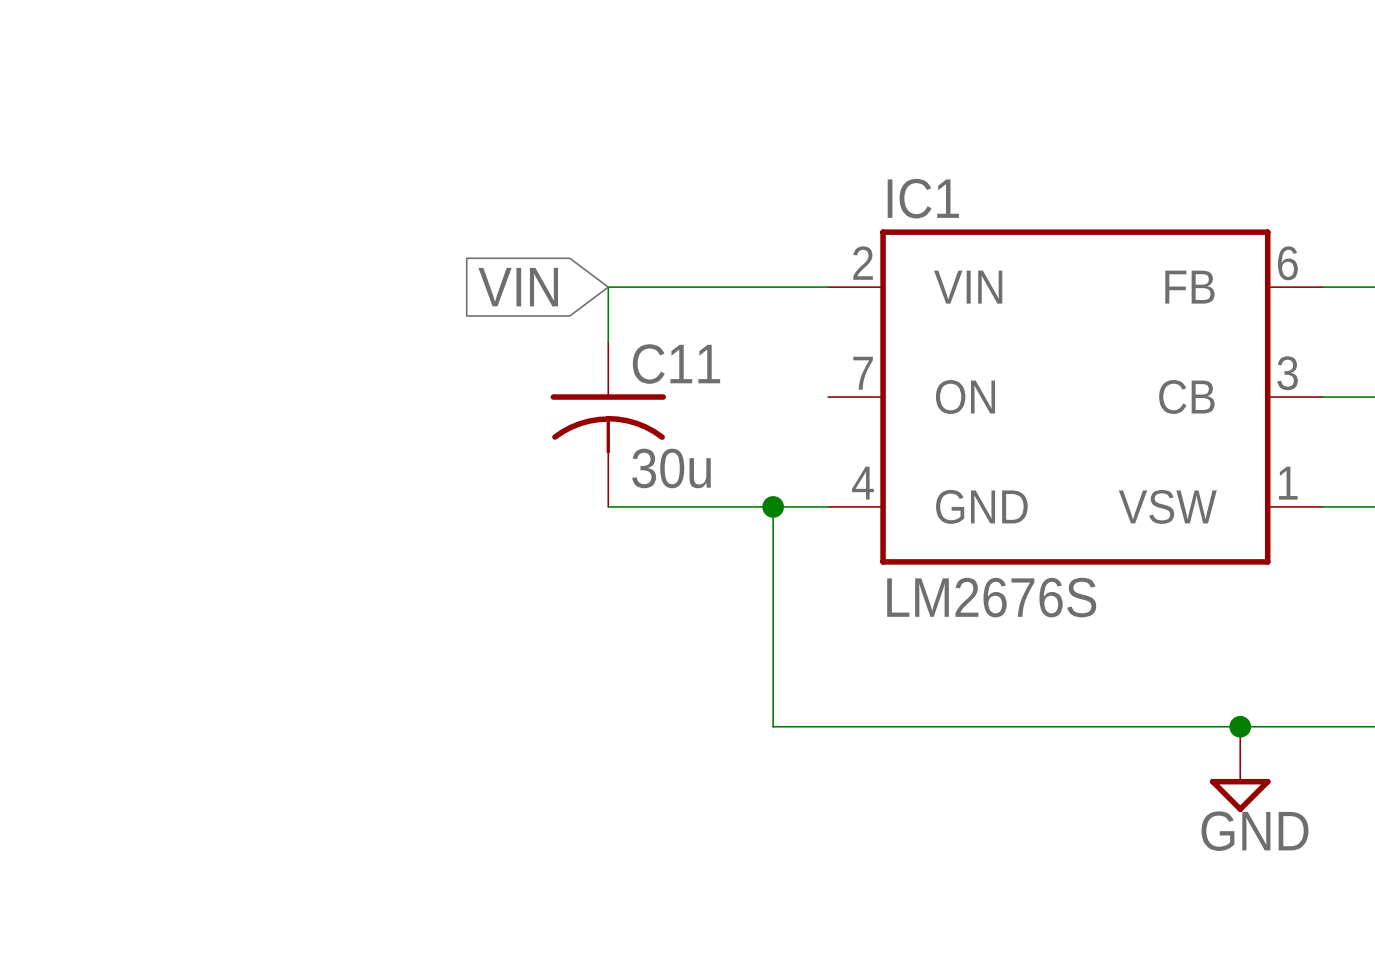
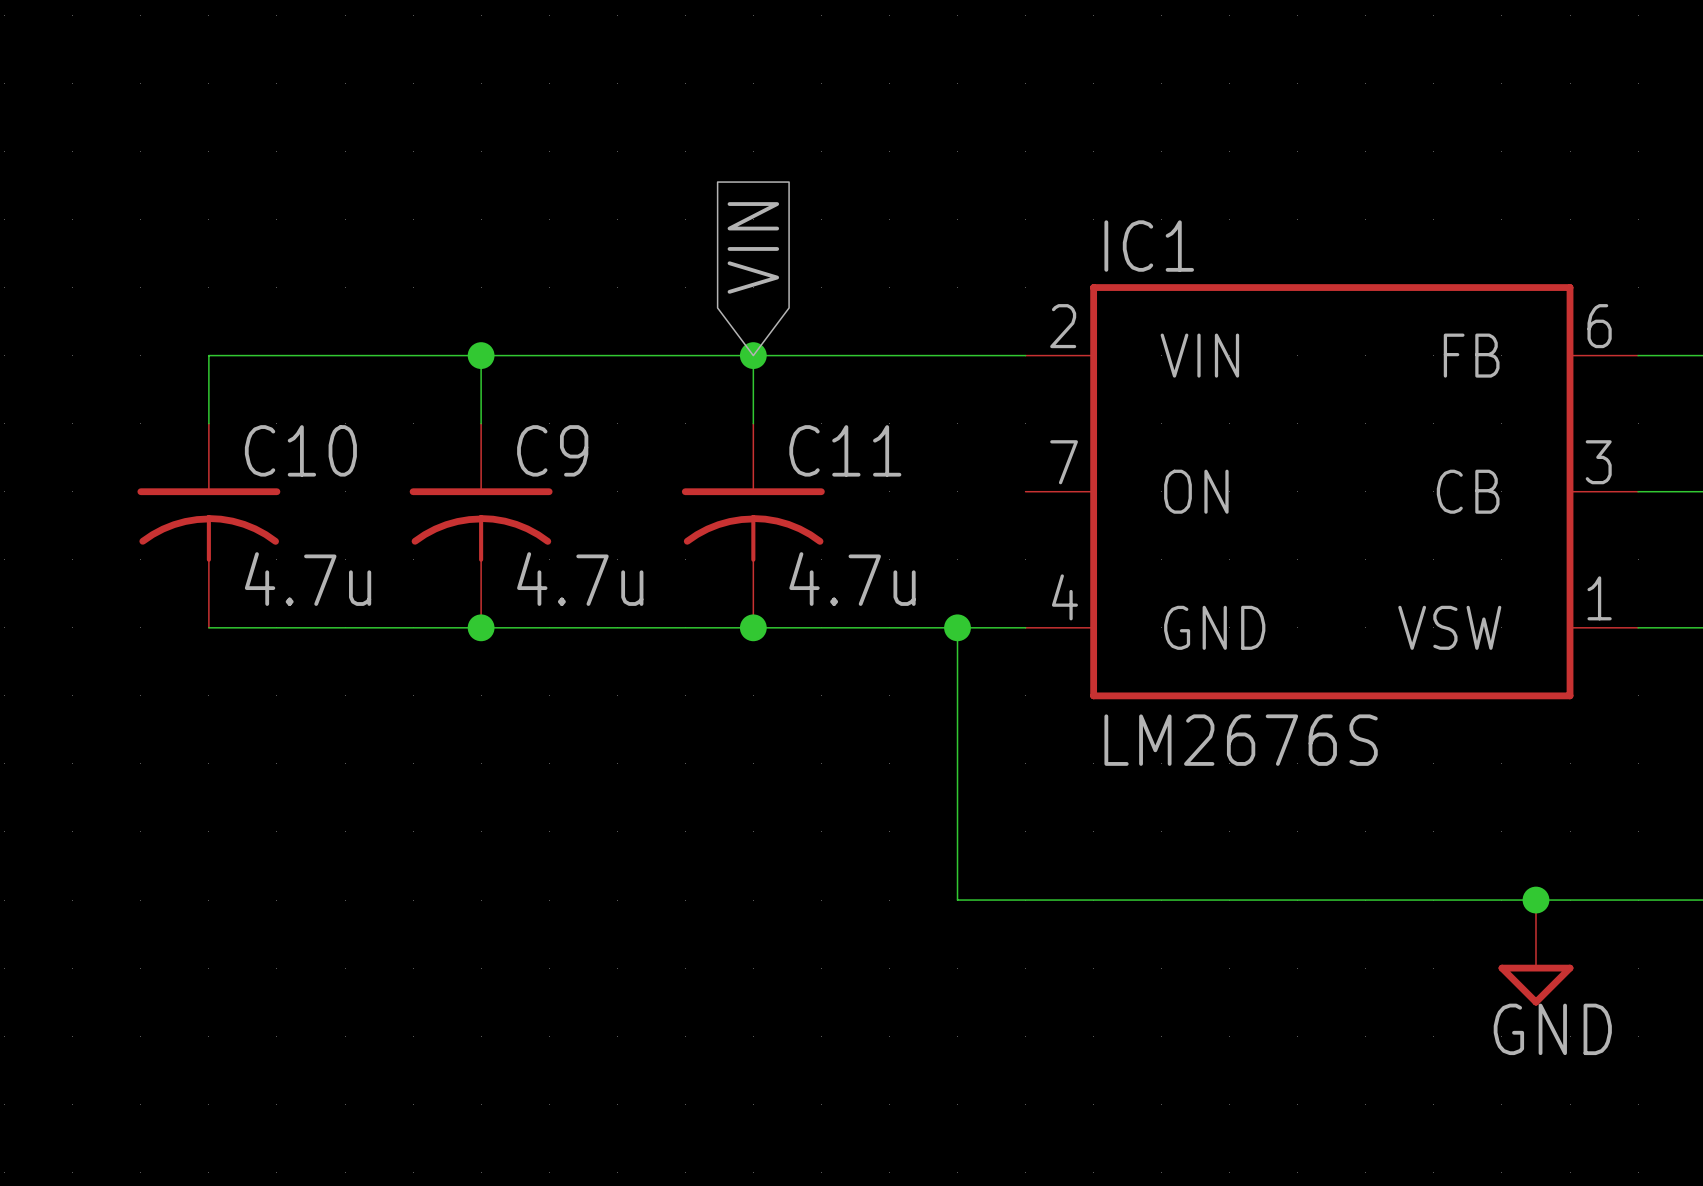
wire: none -> (481, 355) (481, 423)
junction: none -> (481, 355)
global label rotation: 0° (518, 287) -> 90° clockwise (753, 247)
wire: none -> (753, 355) (208, 355) (208, 423)
junction: none -> (753, 355)
C10: none -> 4.7u (208, 525)
C9: none -> 4.7u (481, 525)
C11 value: 30u (671, 468) -> 4.7u (852, 579)
wire: none -> (208, 627) (753, 627)
junction: none -> (481, 627)
junction: none -> (753, 627)

